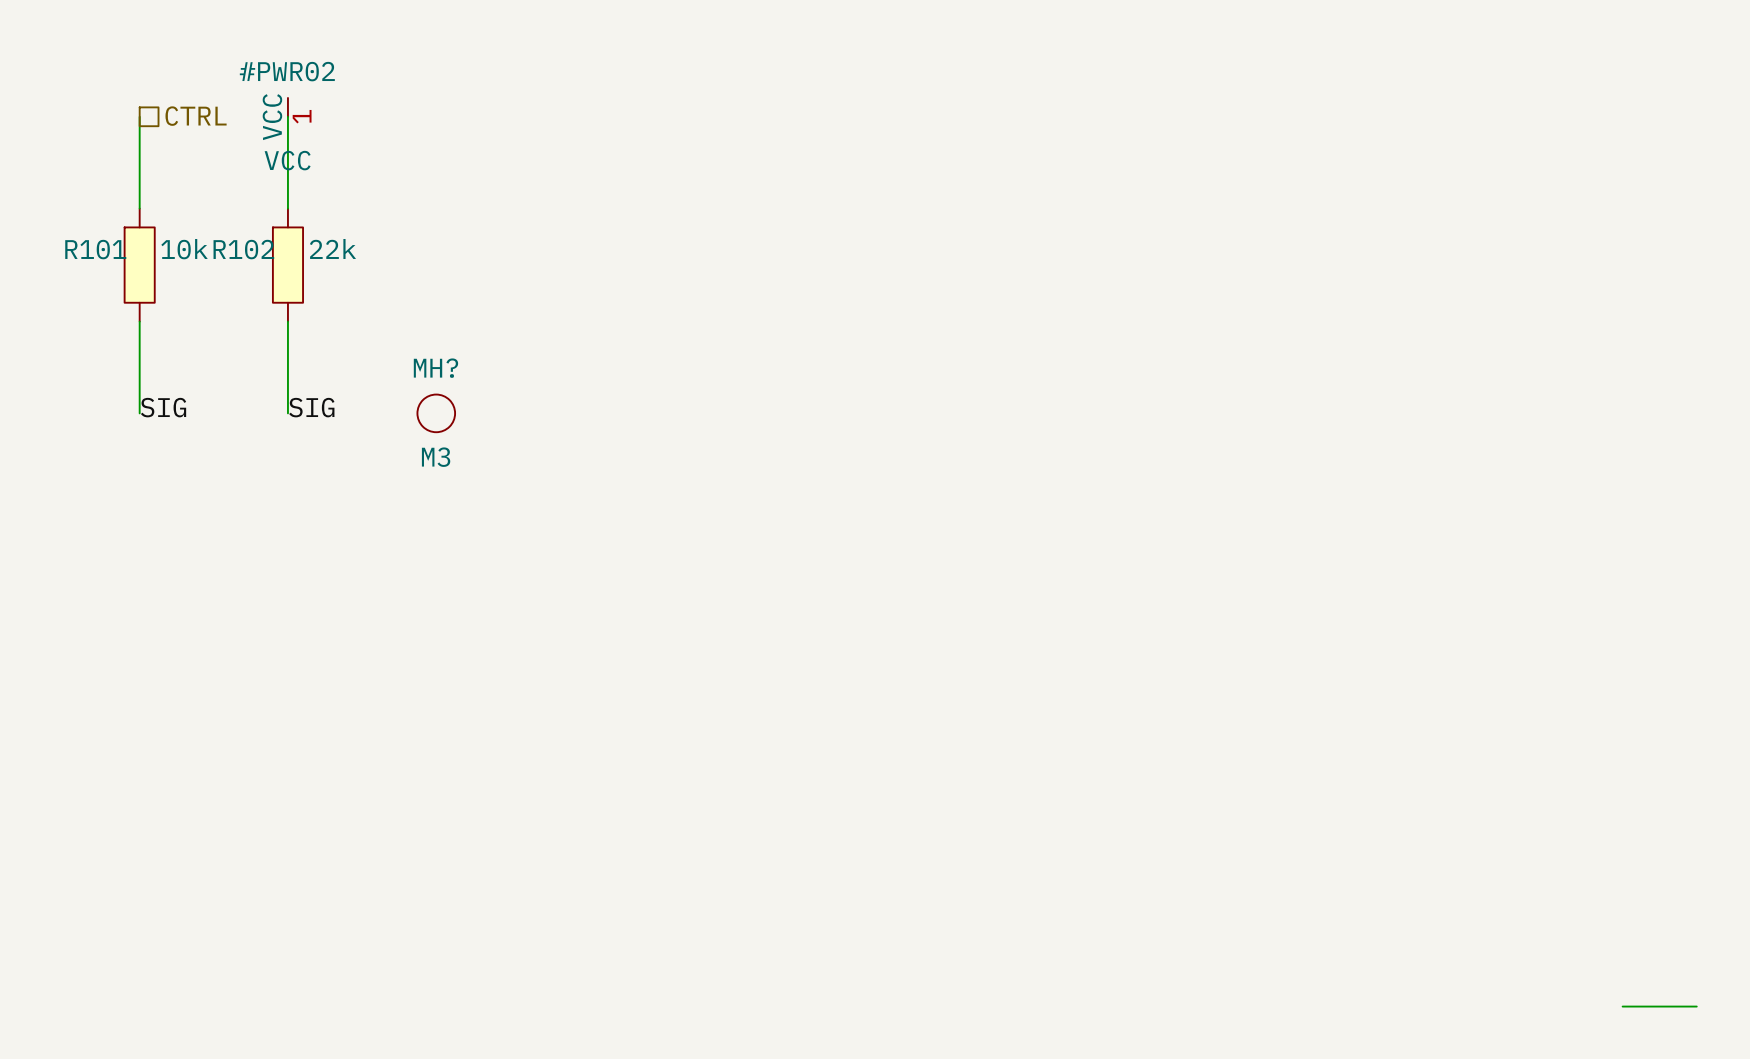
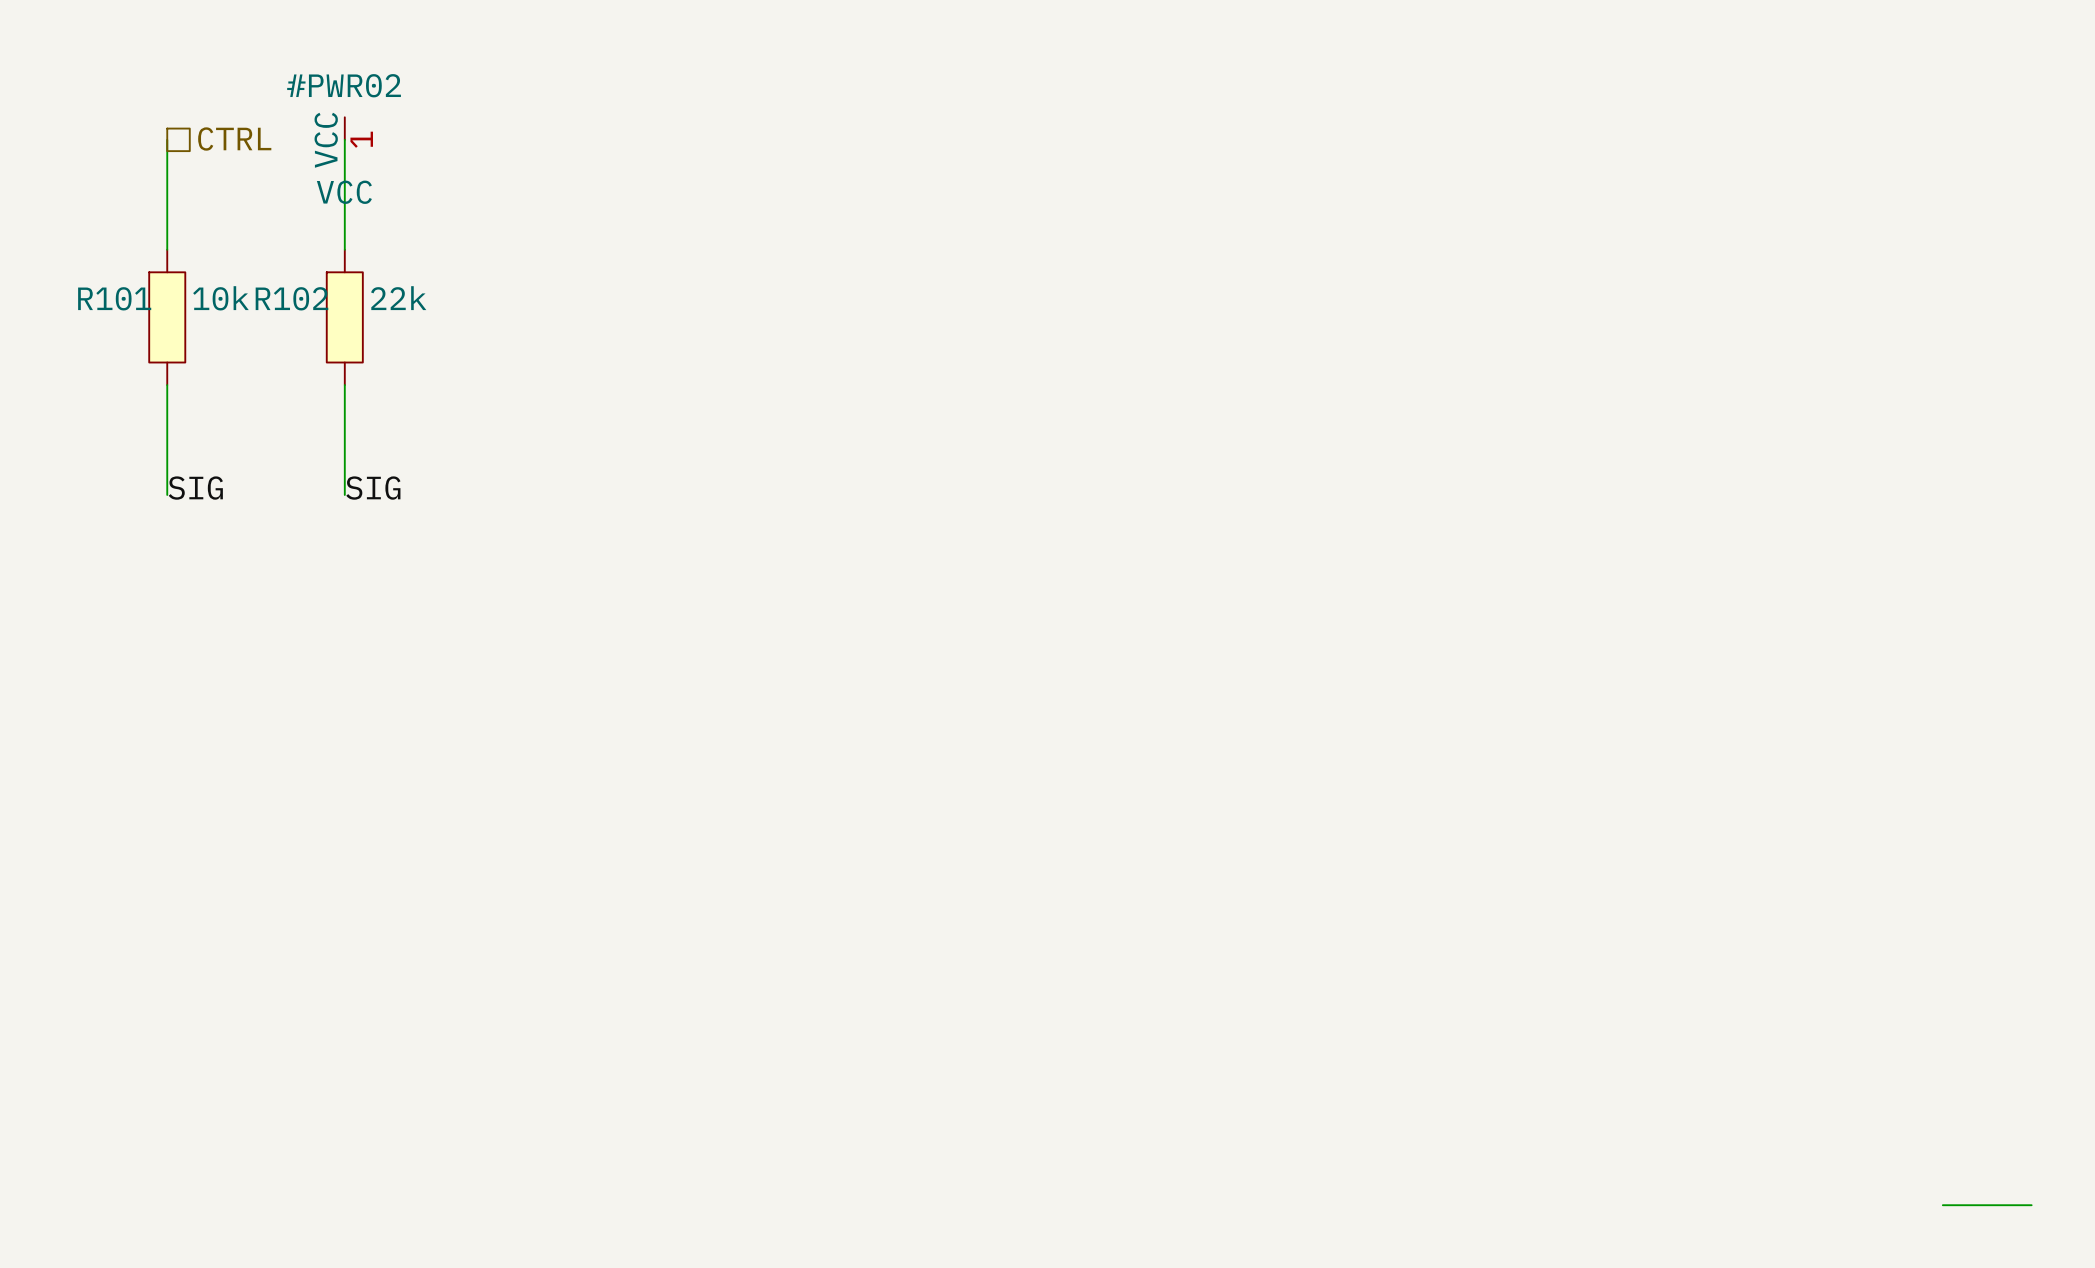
MH?: M3 (436, 413) -> none

